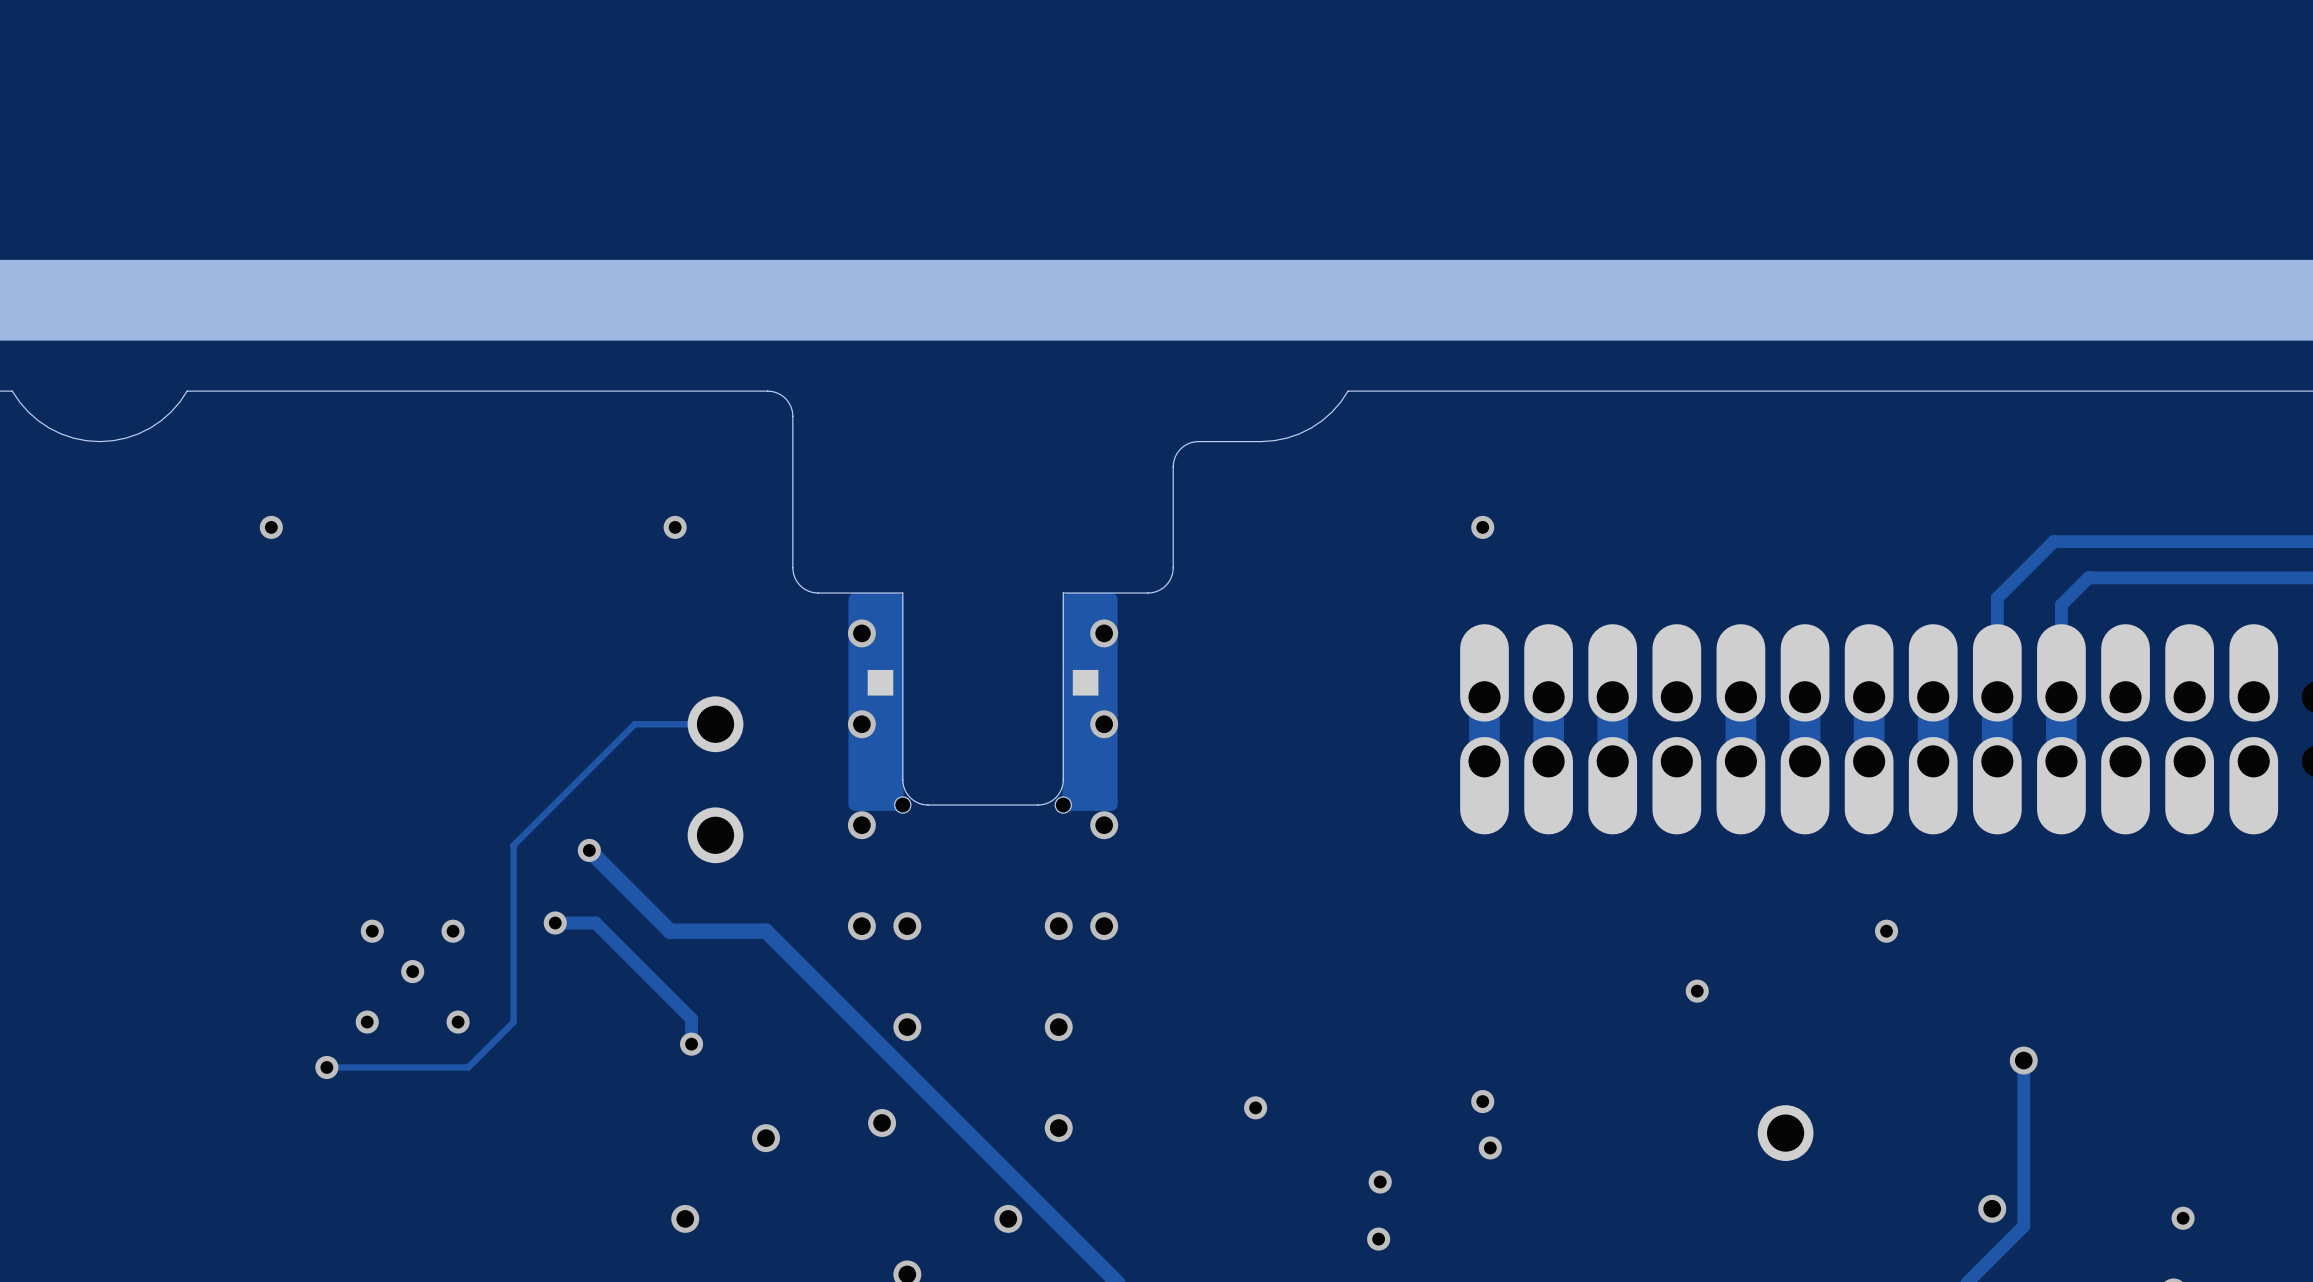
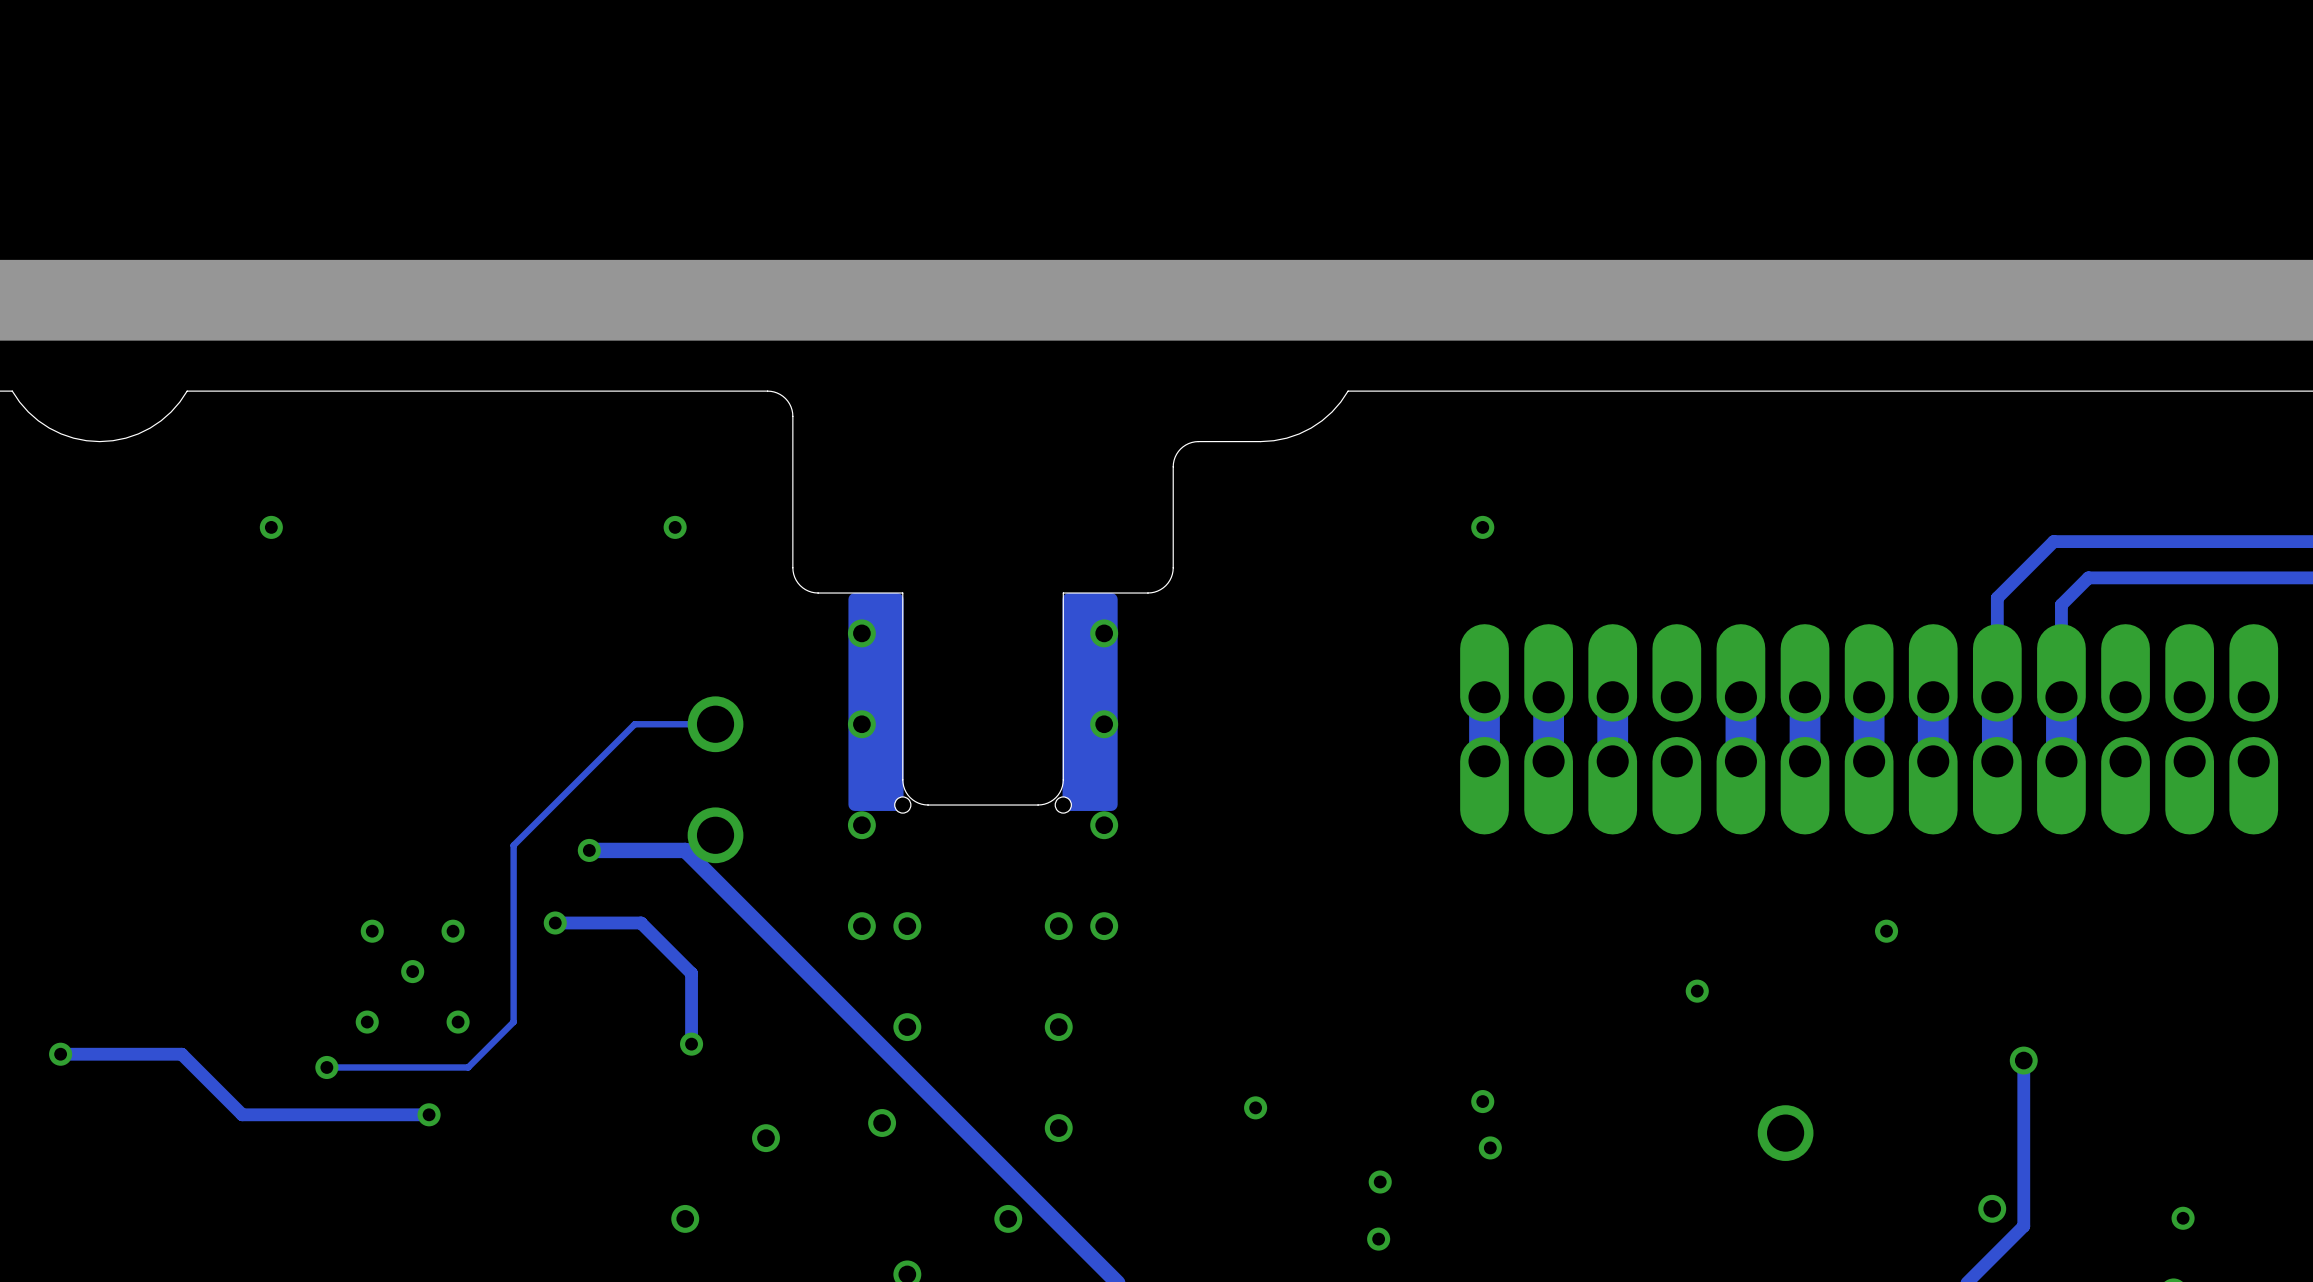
track: (589, 850) (670, 931) (766, 931) -> (589, 850) (685, 850) (766, 931)
track: (595, 922) (691, 1018) -> (595, 922) (641, 922) (691, 973) (691, 1018)
track: none -> (60, 1054) (181, 1054) (242, 1114) (429, 1114)
via: none -> (60, 1054)
via: none -> (429, 1114)

